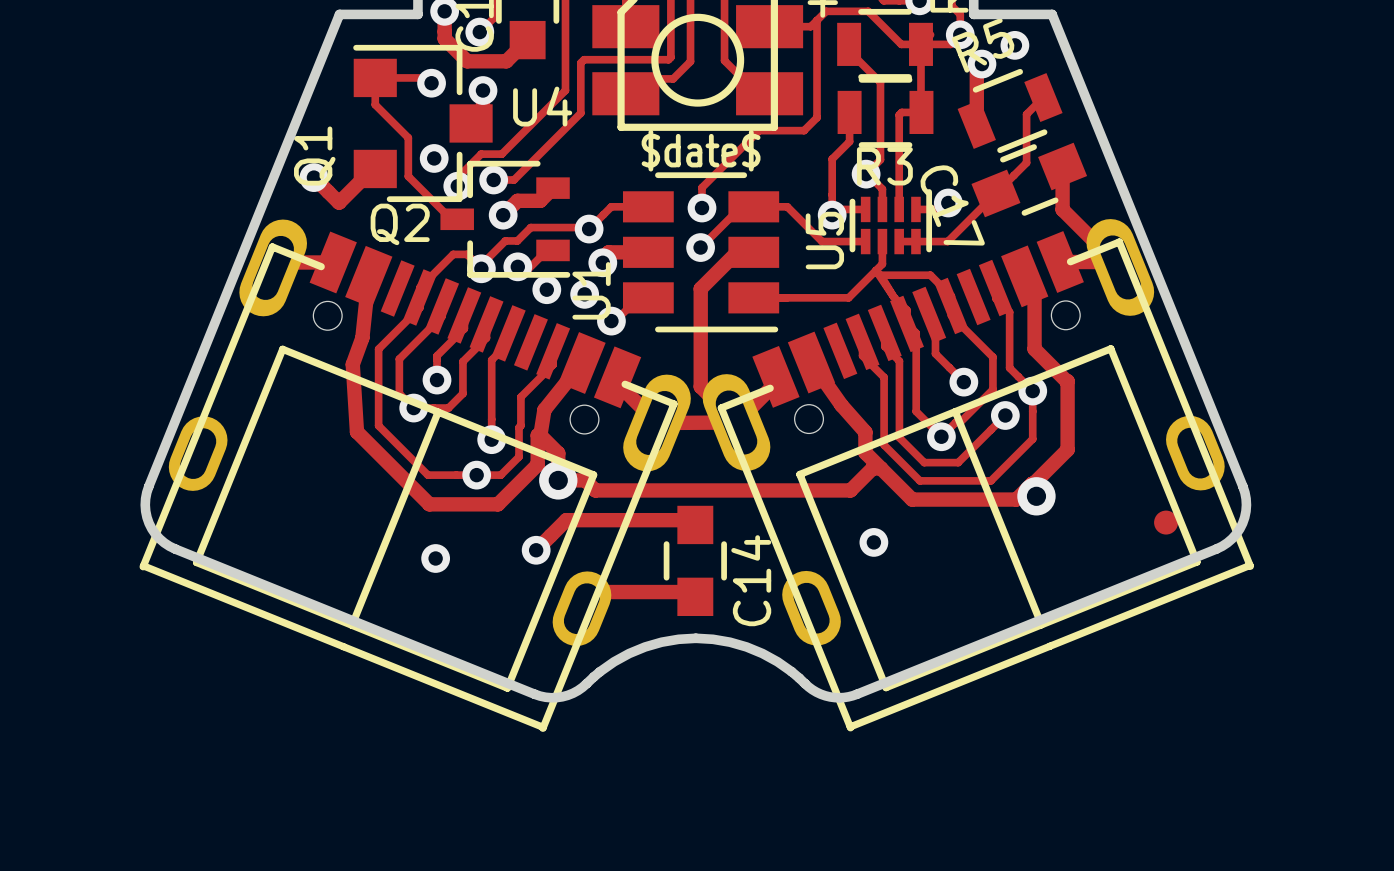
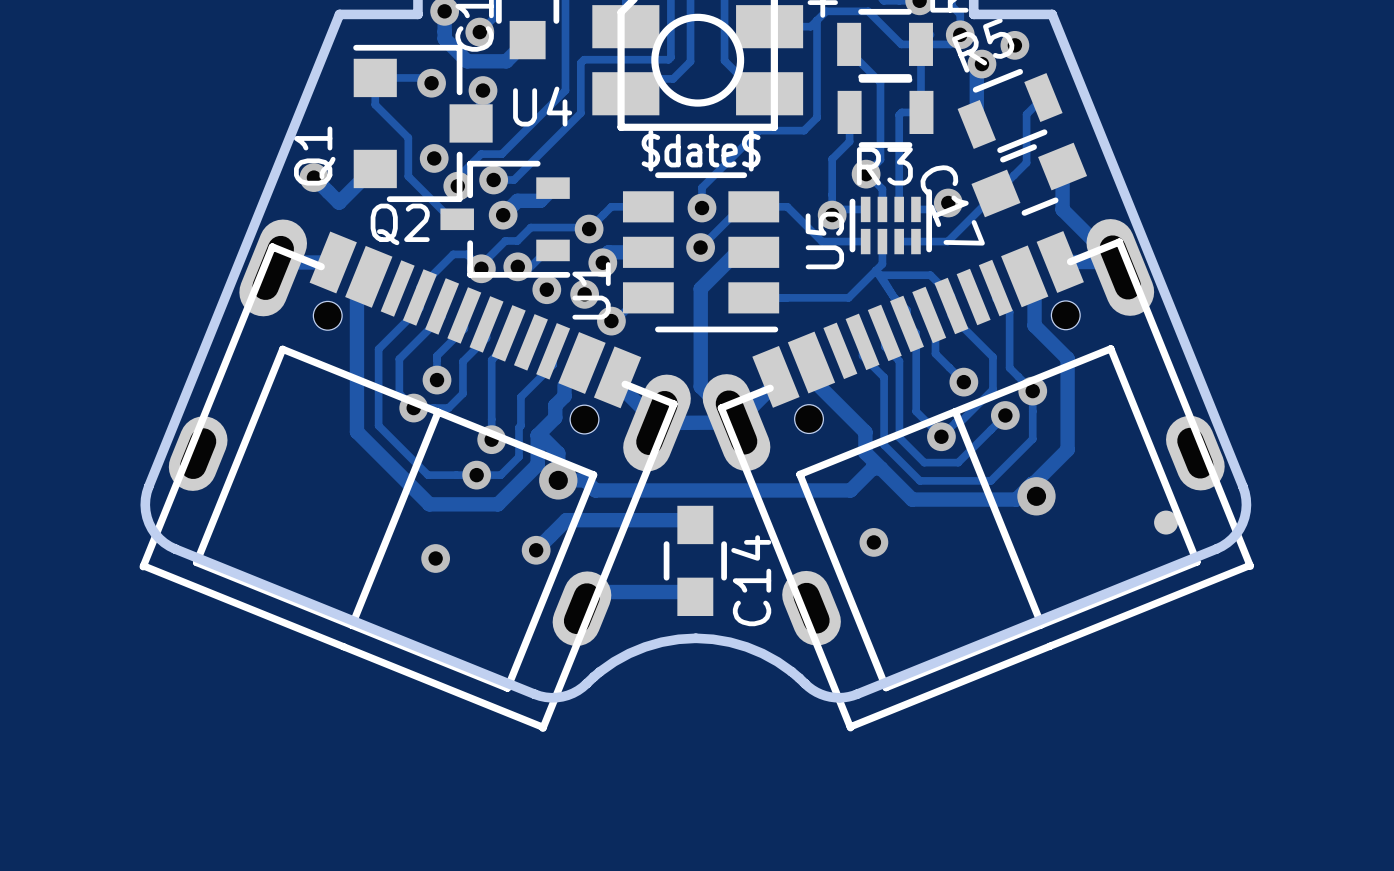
track: (368, 276) (362, 338) (352, 364) (356, 431) -> (356, 288) (356, 431)
track: (1034, 325) (1034, 349) (1067, 381) -> (1034, 325) (1067, 358) (1067, 381)
track: (811, 362) (841, 405) (865, 432) -> (811, 378) (865, 432)
track: (582, 363) (544, 409) (540, 435) -> none
track: none -> (564, 385) (564, 396) (555, 405) (555, 417) (537, 435)

